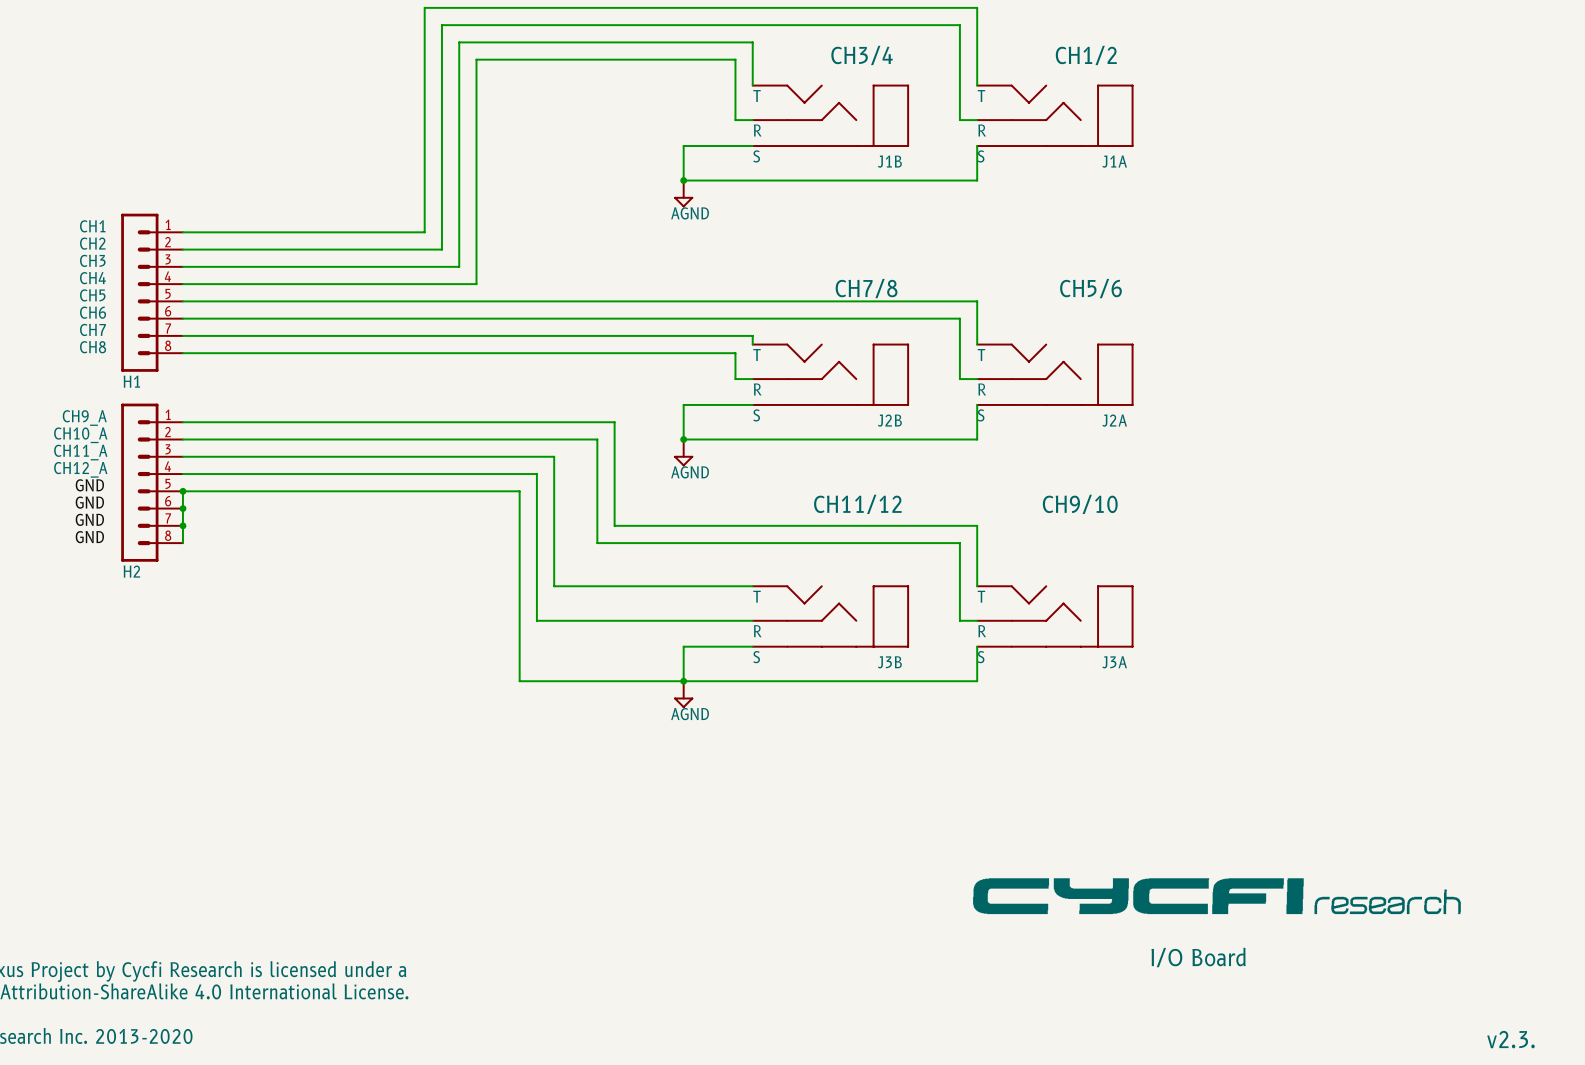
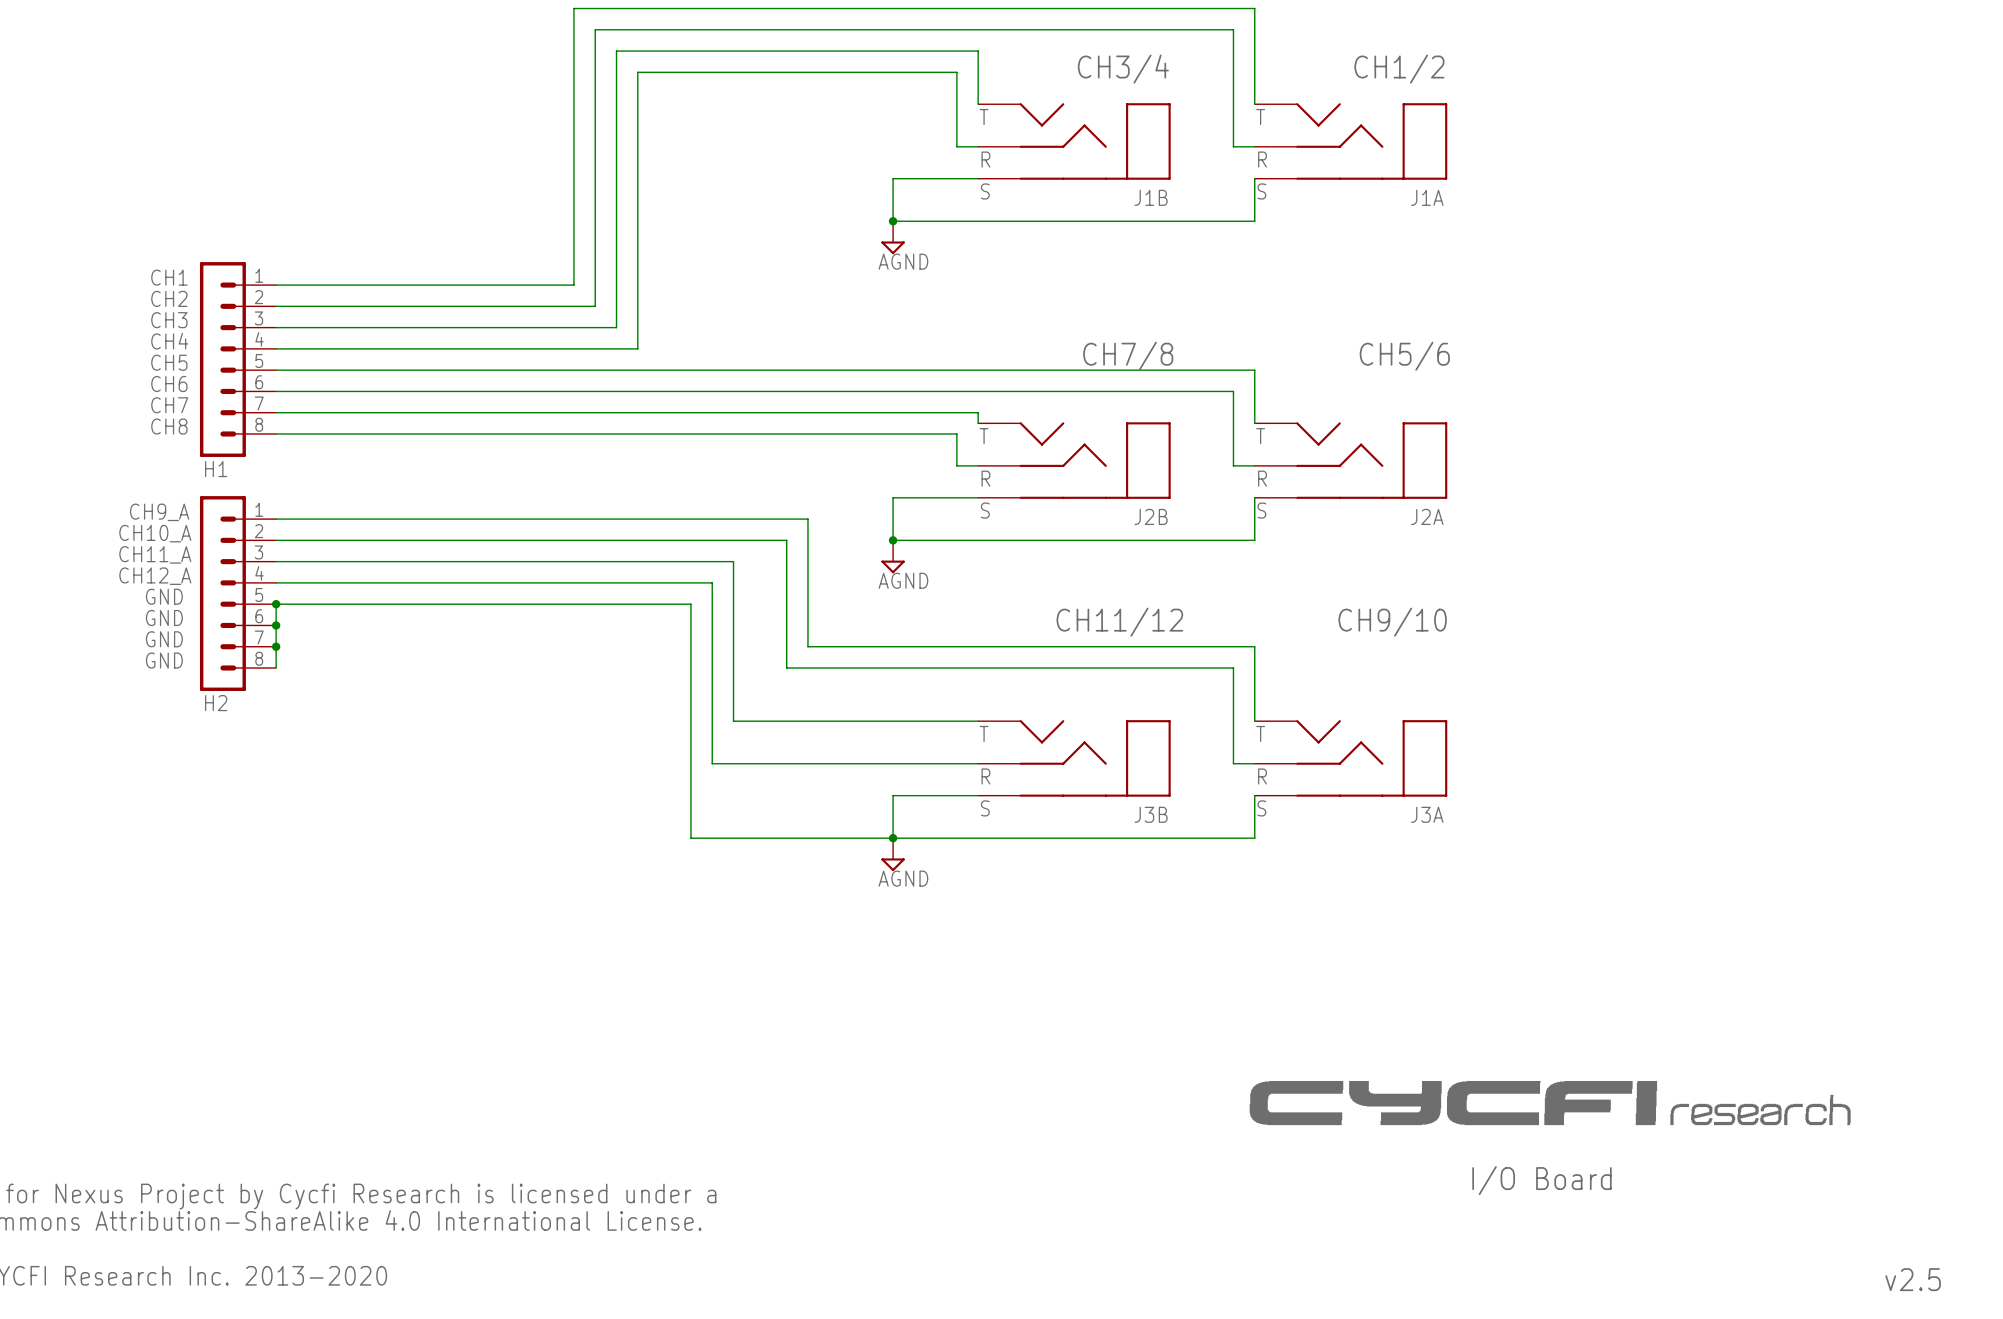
text: v2.3. (1510, 1039) -> v2.5 (1913, 1279)

